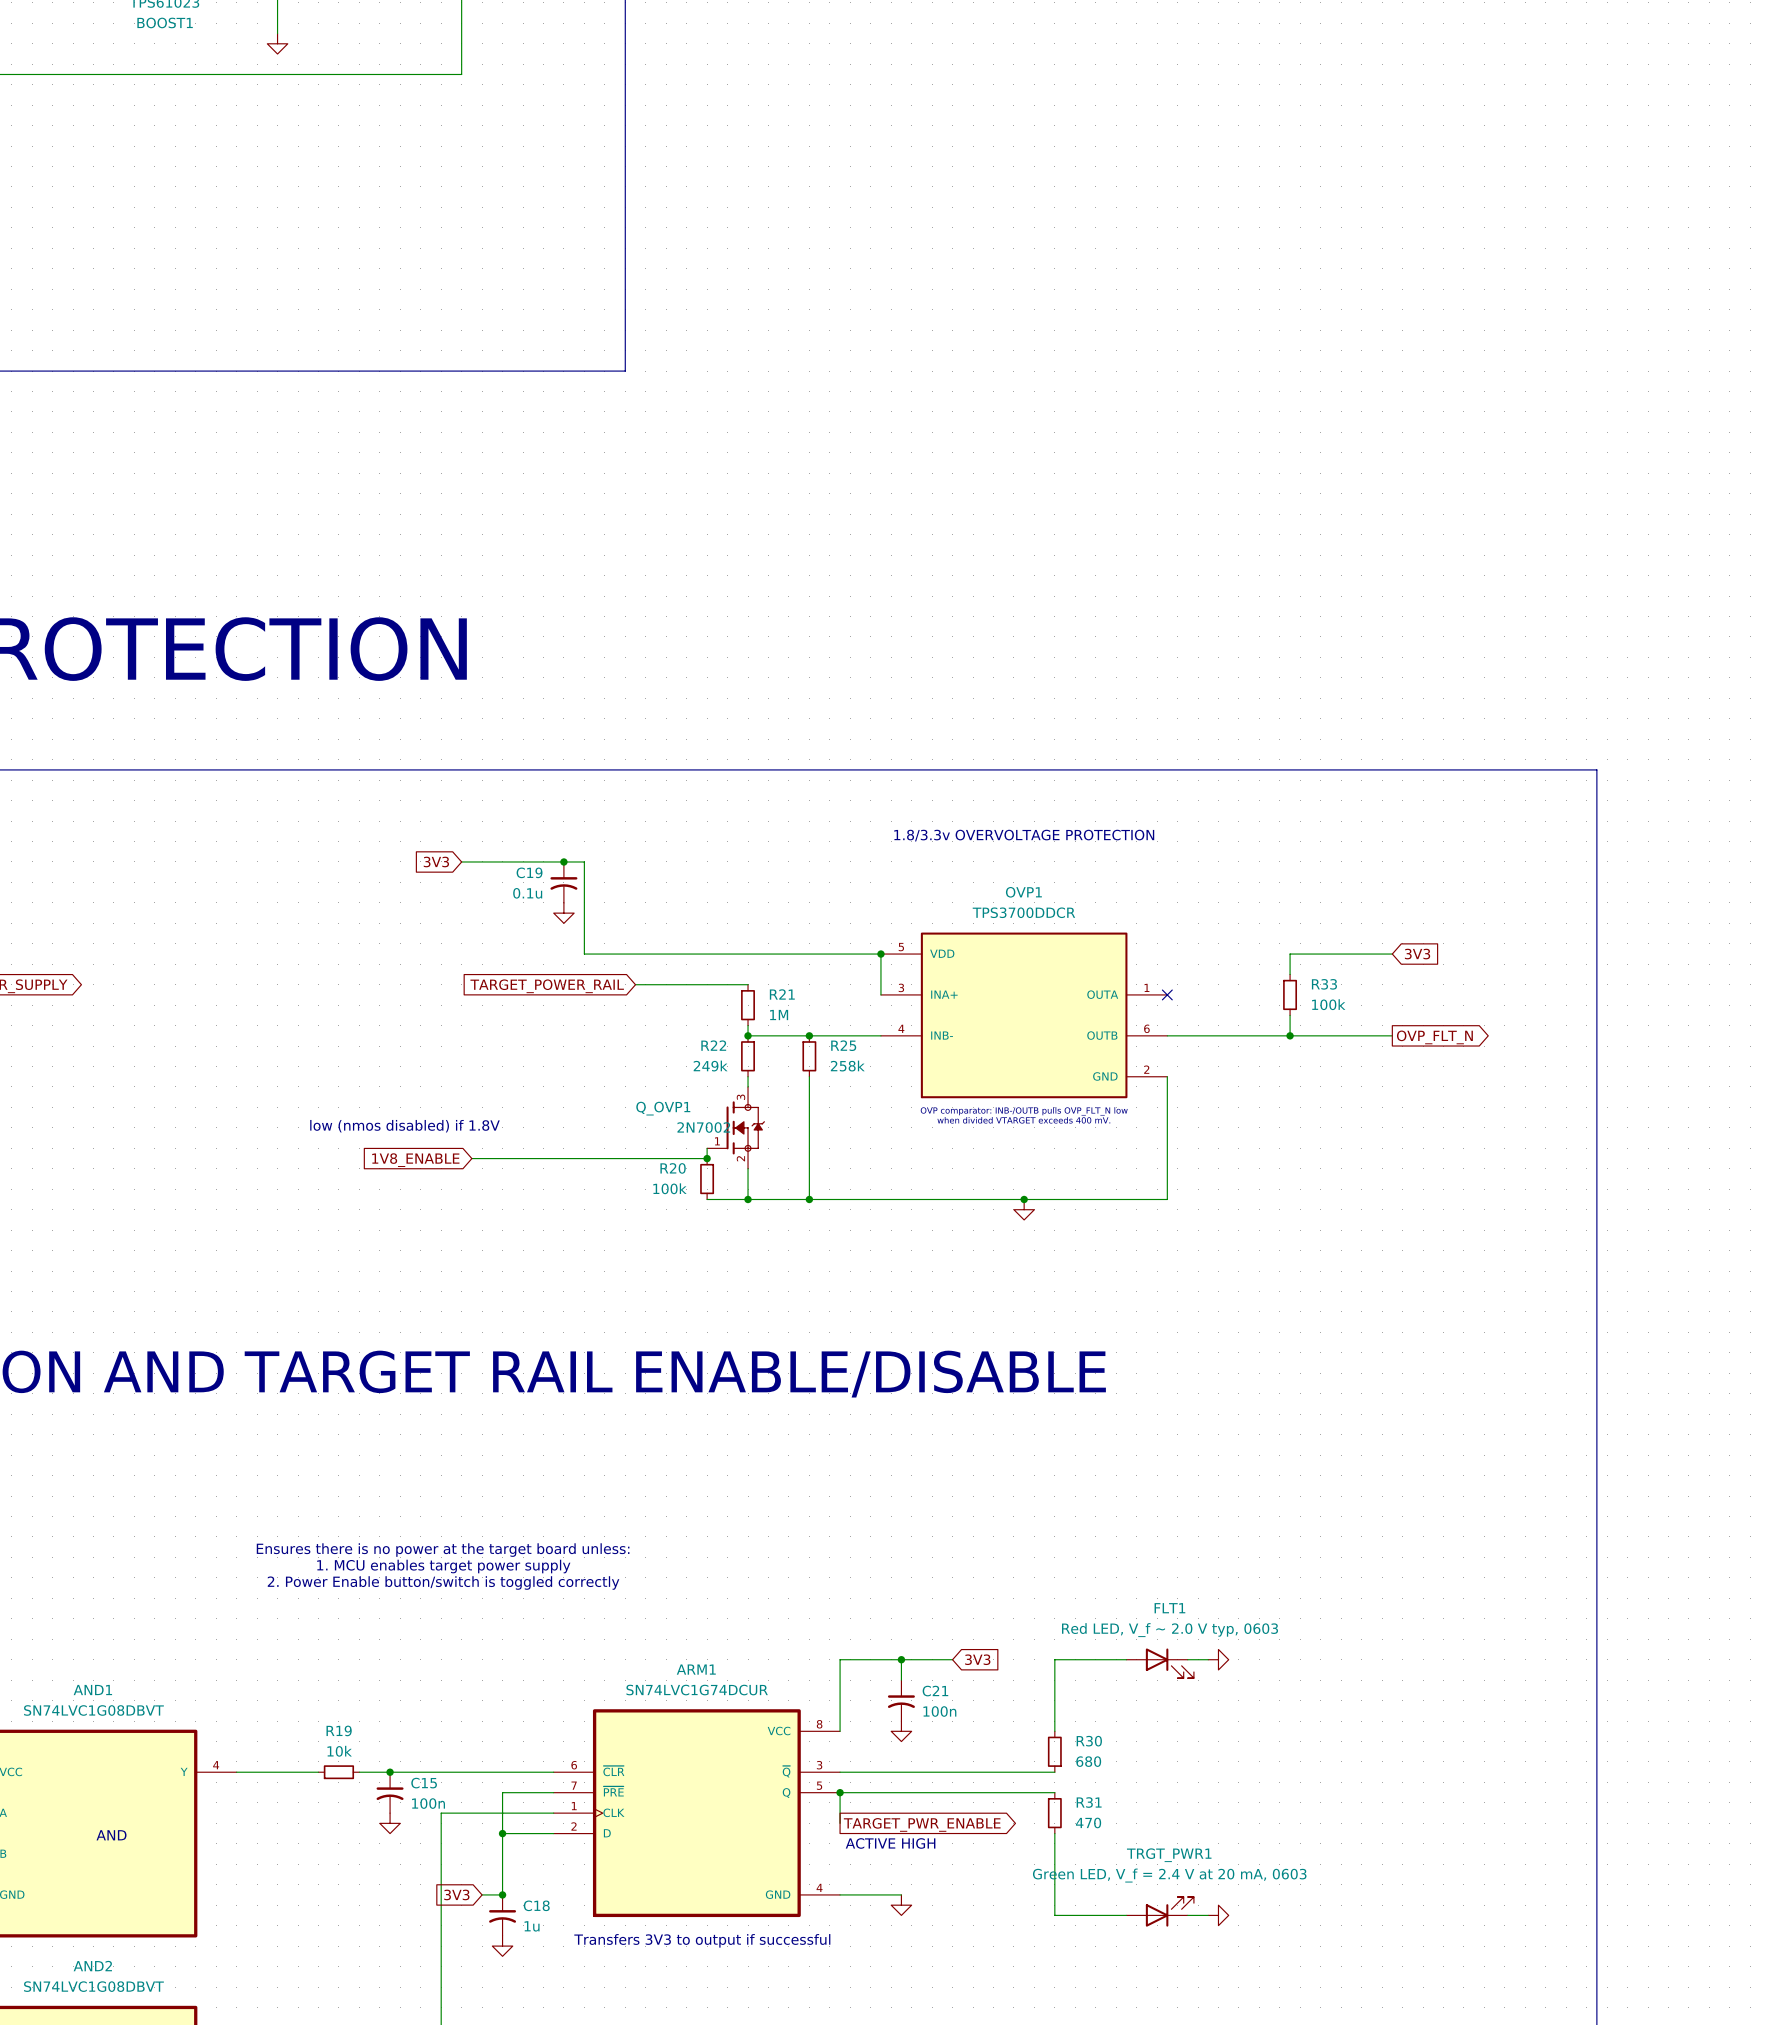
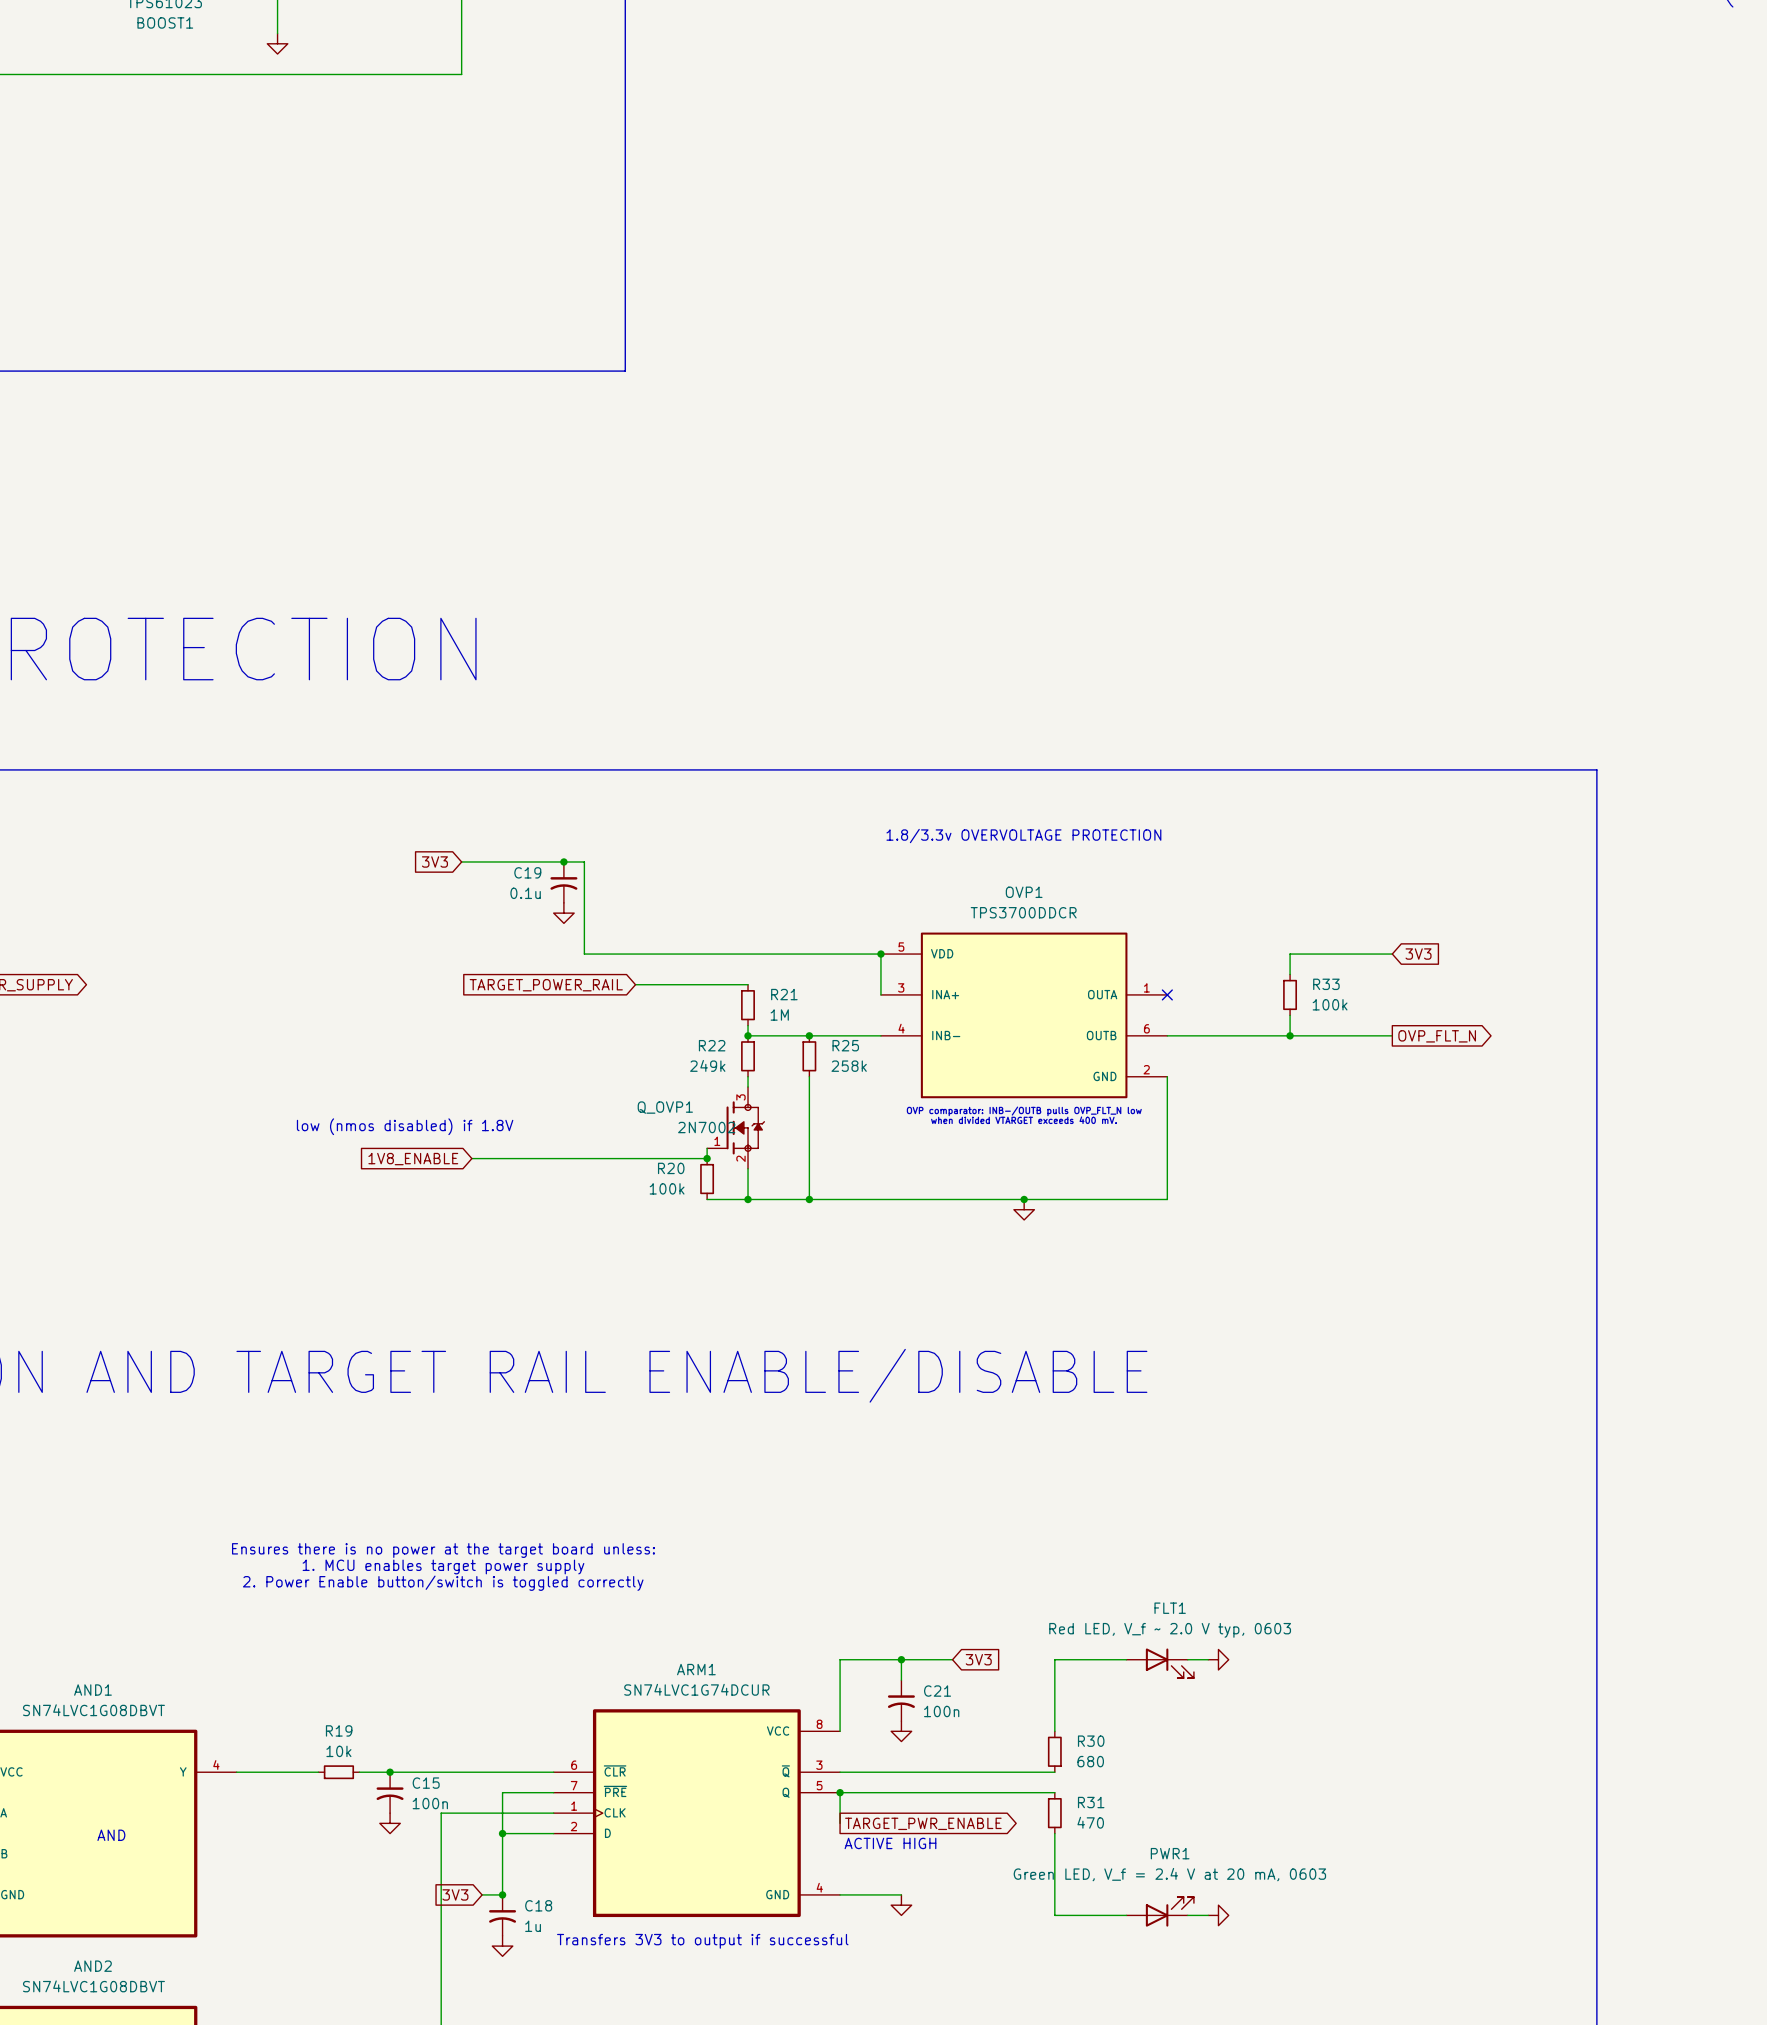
TRGT_PWR1 name: TRGT_PWR1 (1169, 1855) -> PWR1 (1170, 1853)

